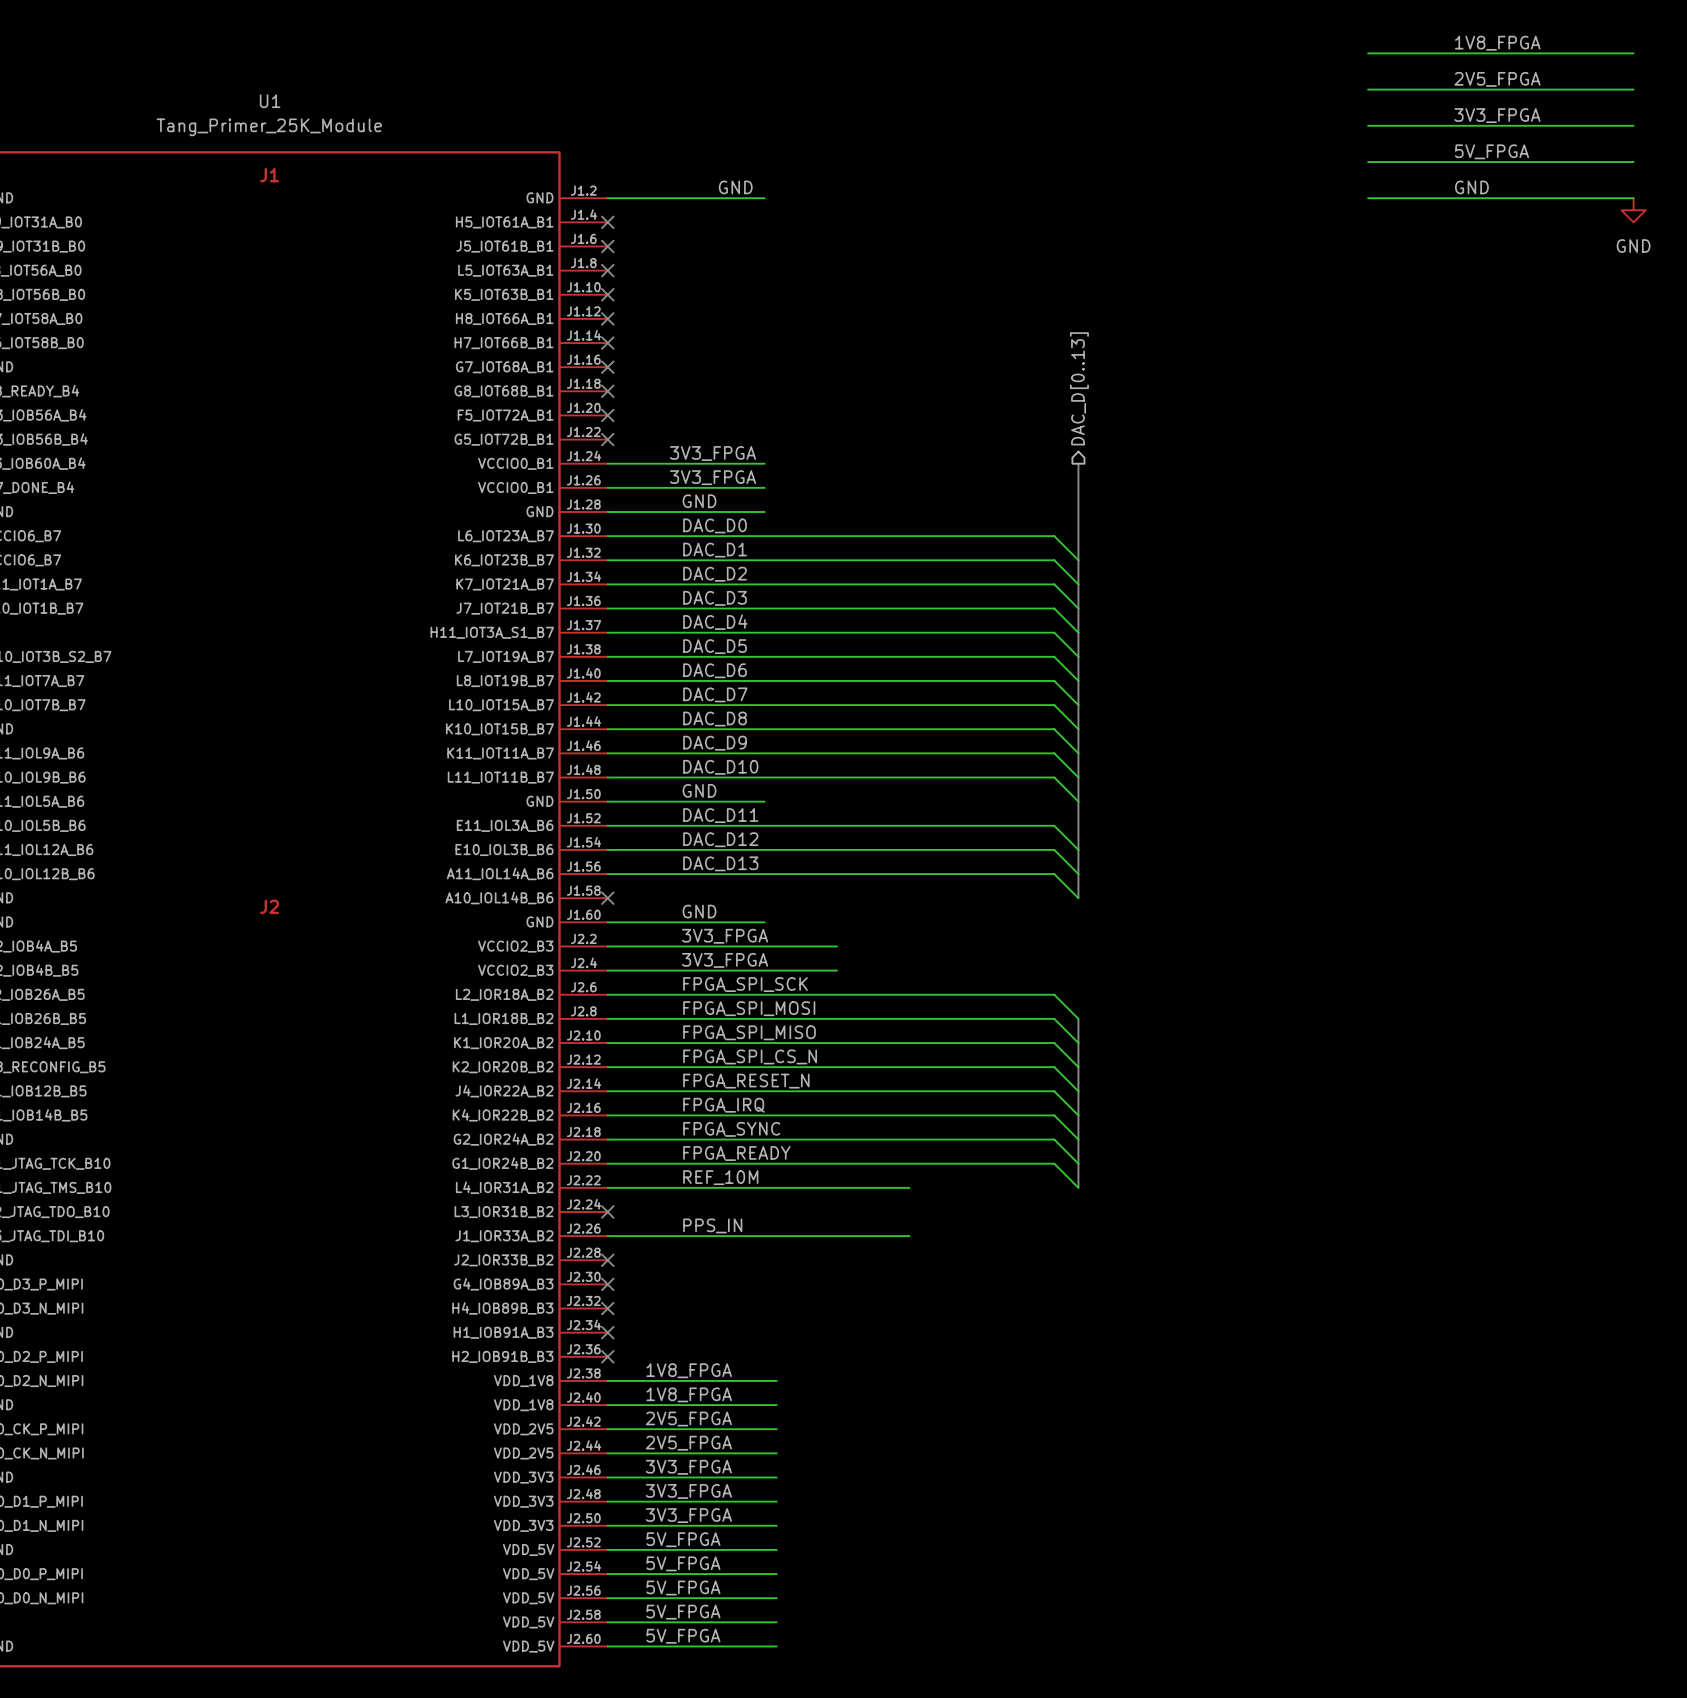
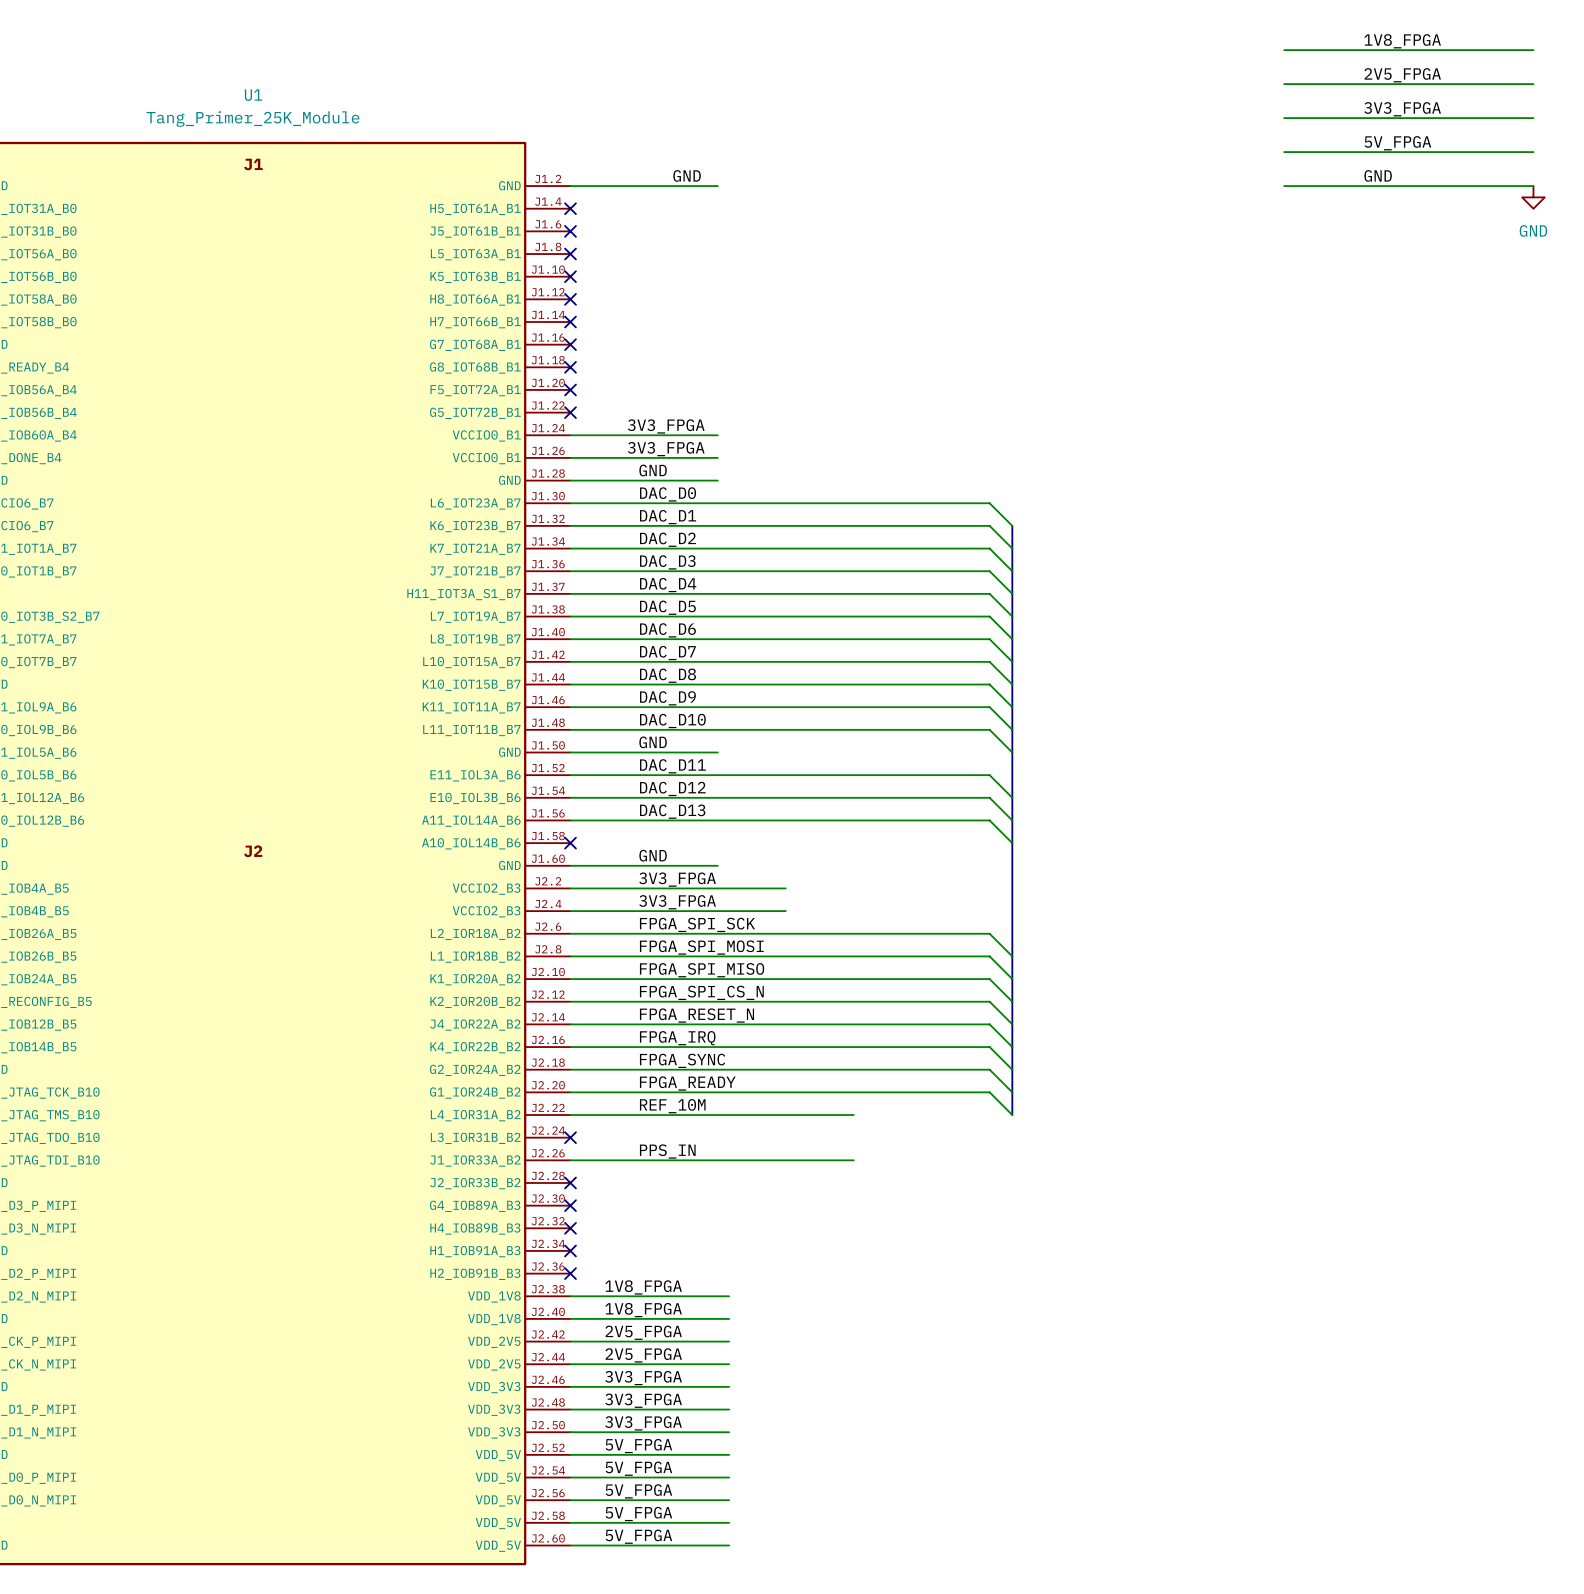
hierarchical label: DAC_D[0..13] (1079, 388) -> none
bus: (1078, 463) (1078, 560) -> none
bus: none -> (1012, 843) (1012, 956)

